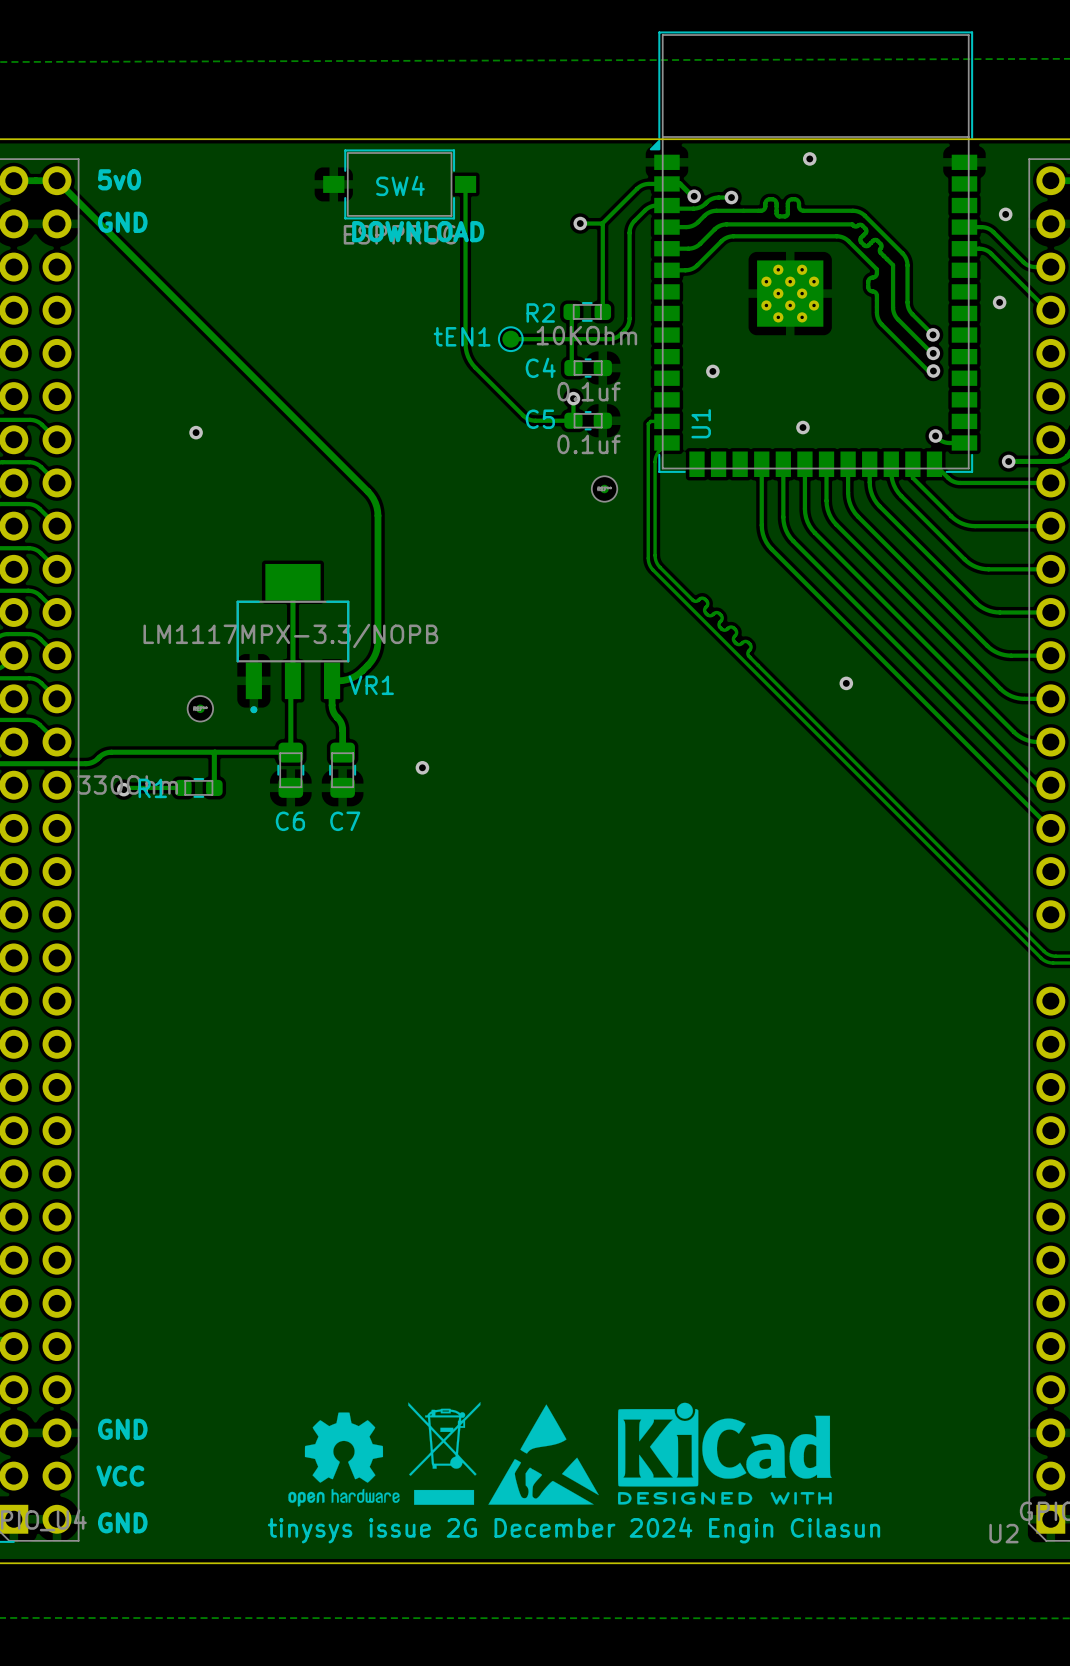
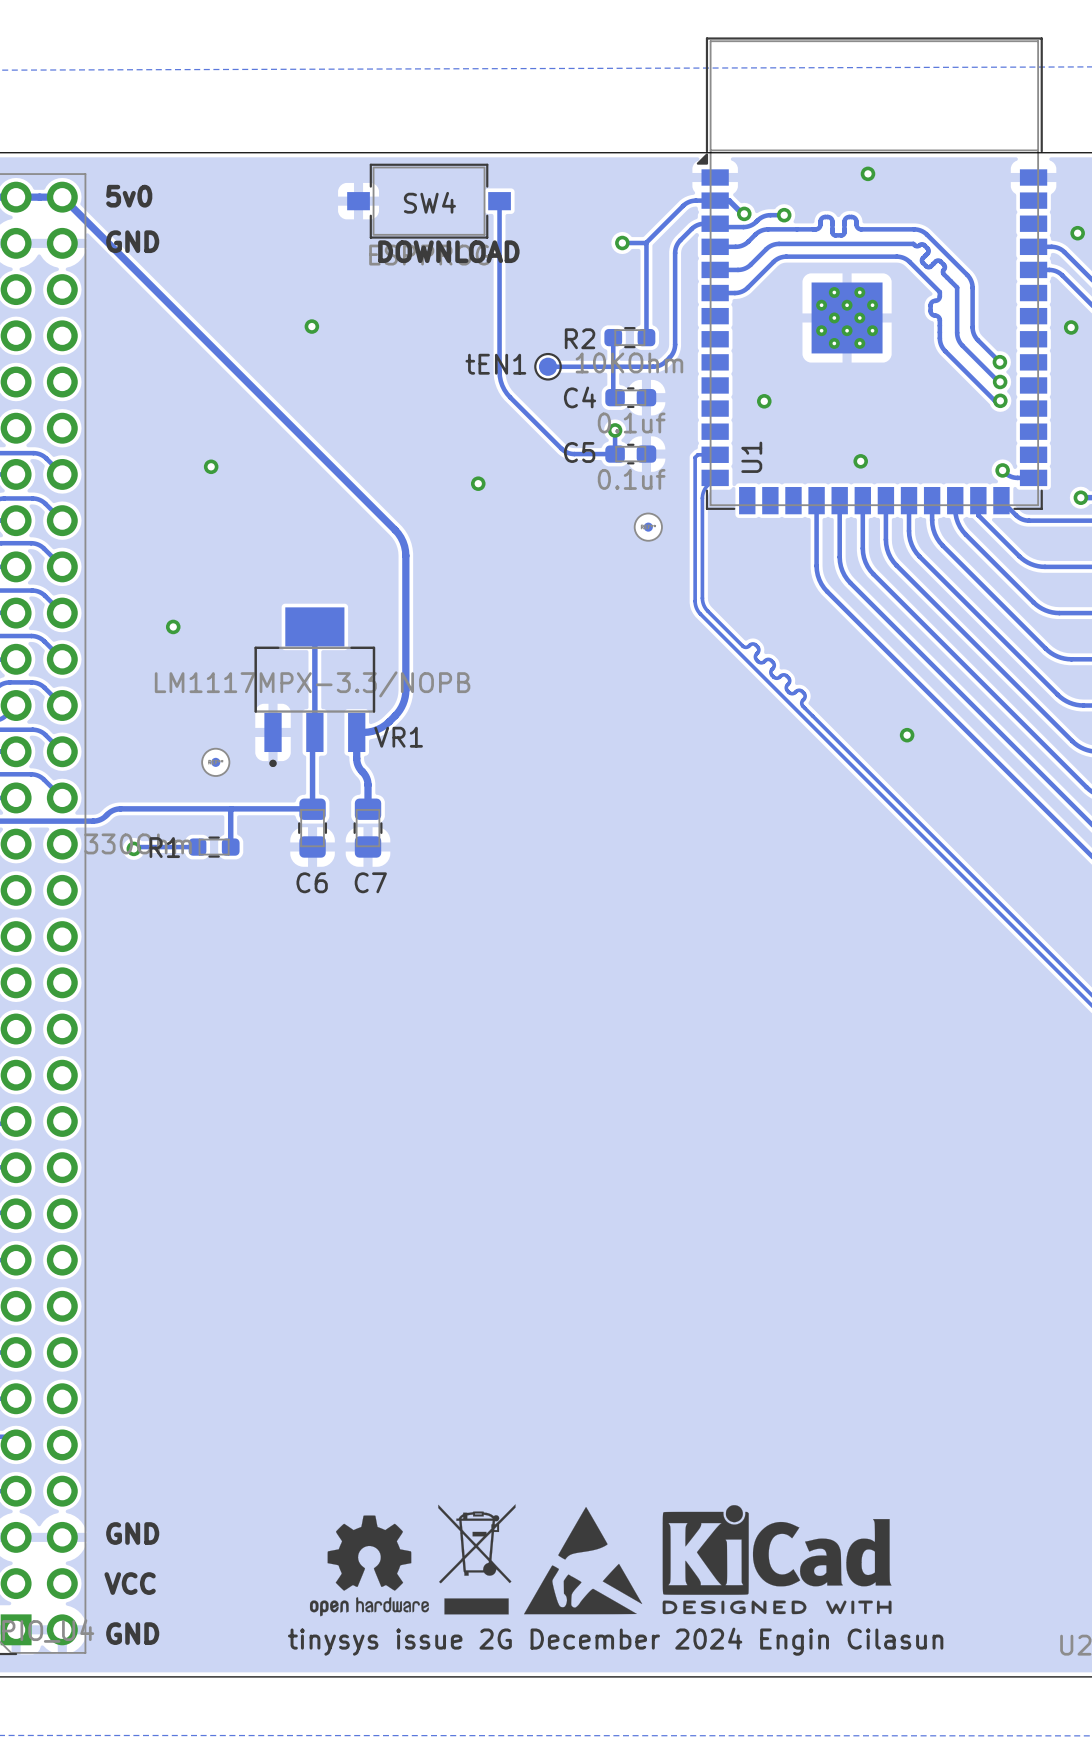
via: none -> (311, 326)
via: none -> (478, 483)
via: none -> (173, 626)
via: (422, 767) -> none

